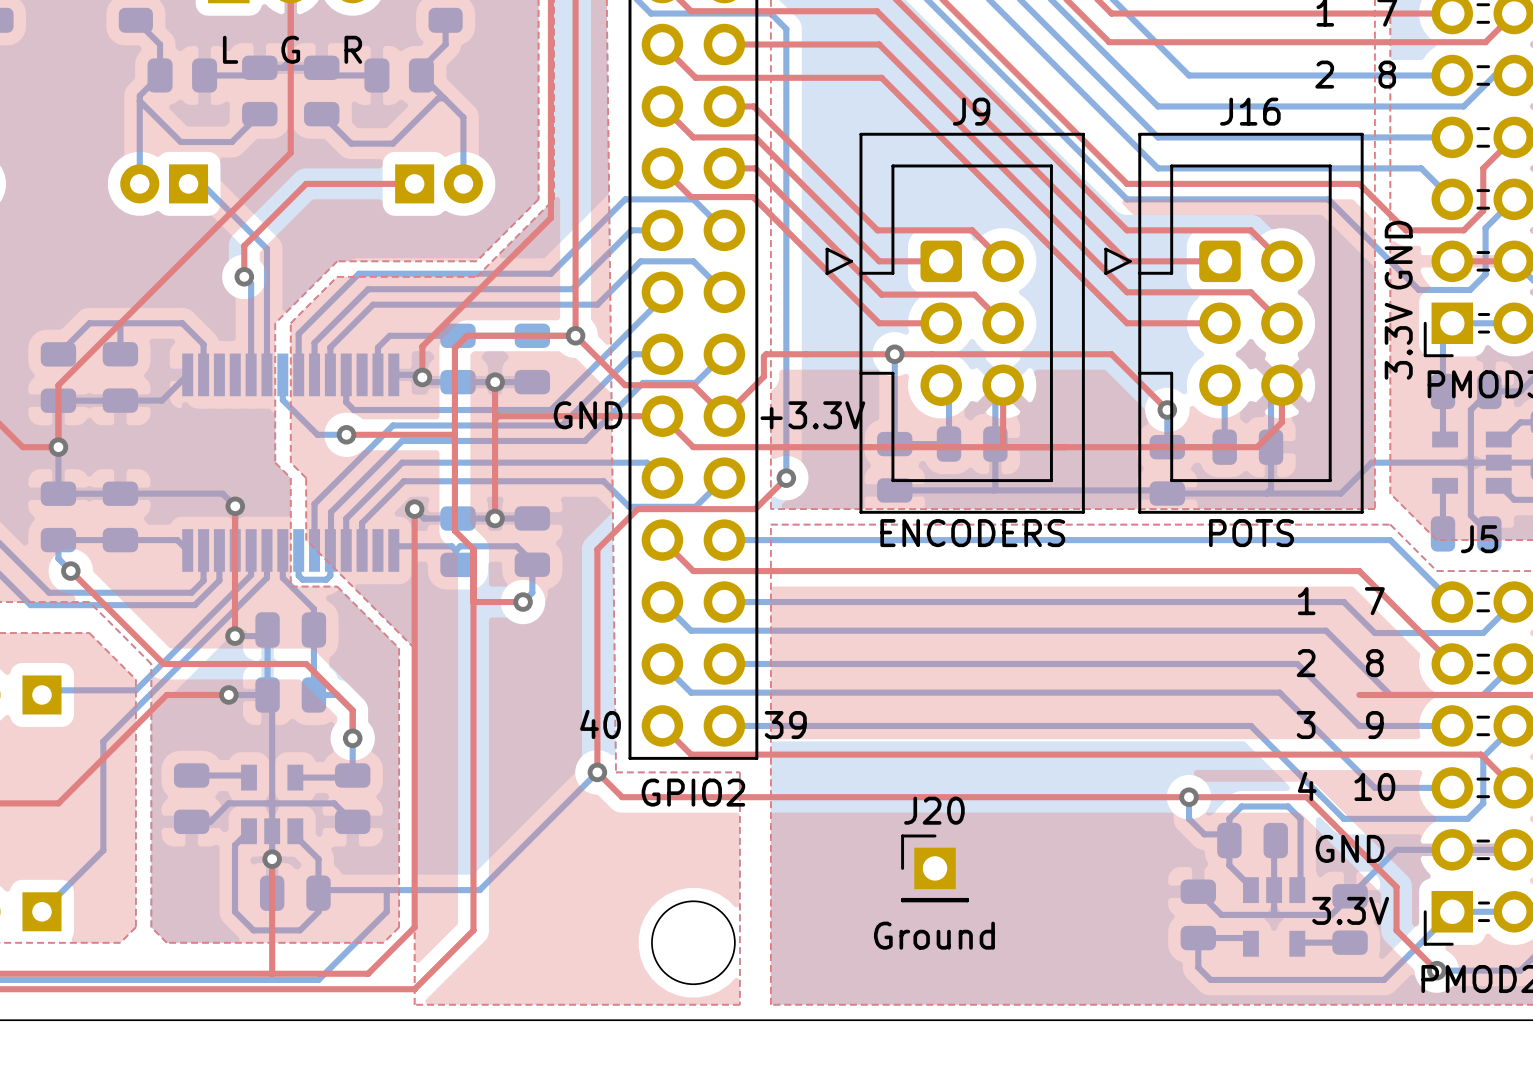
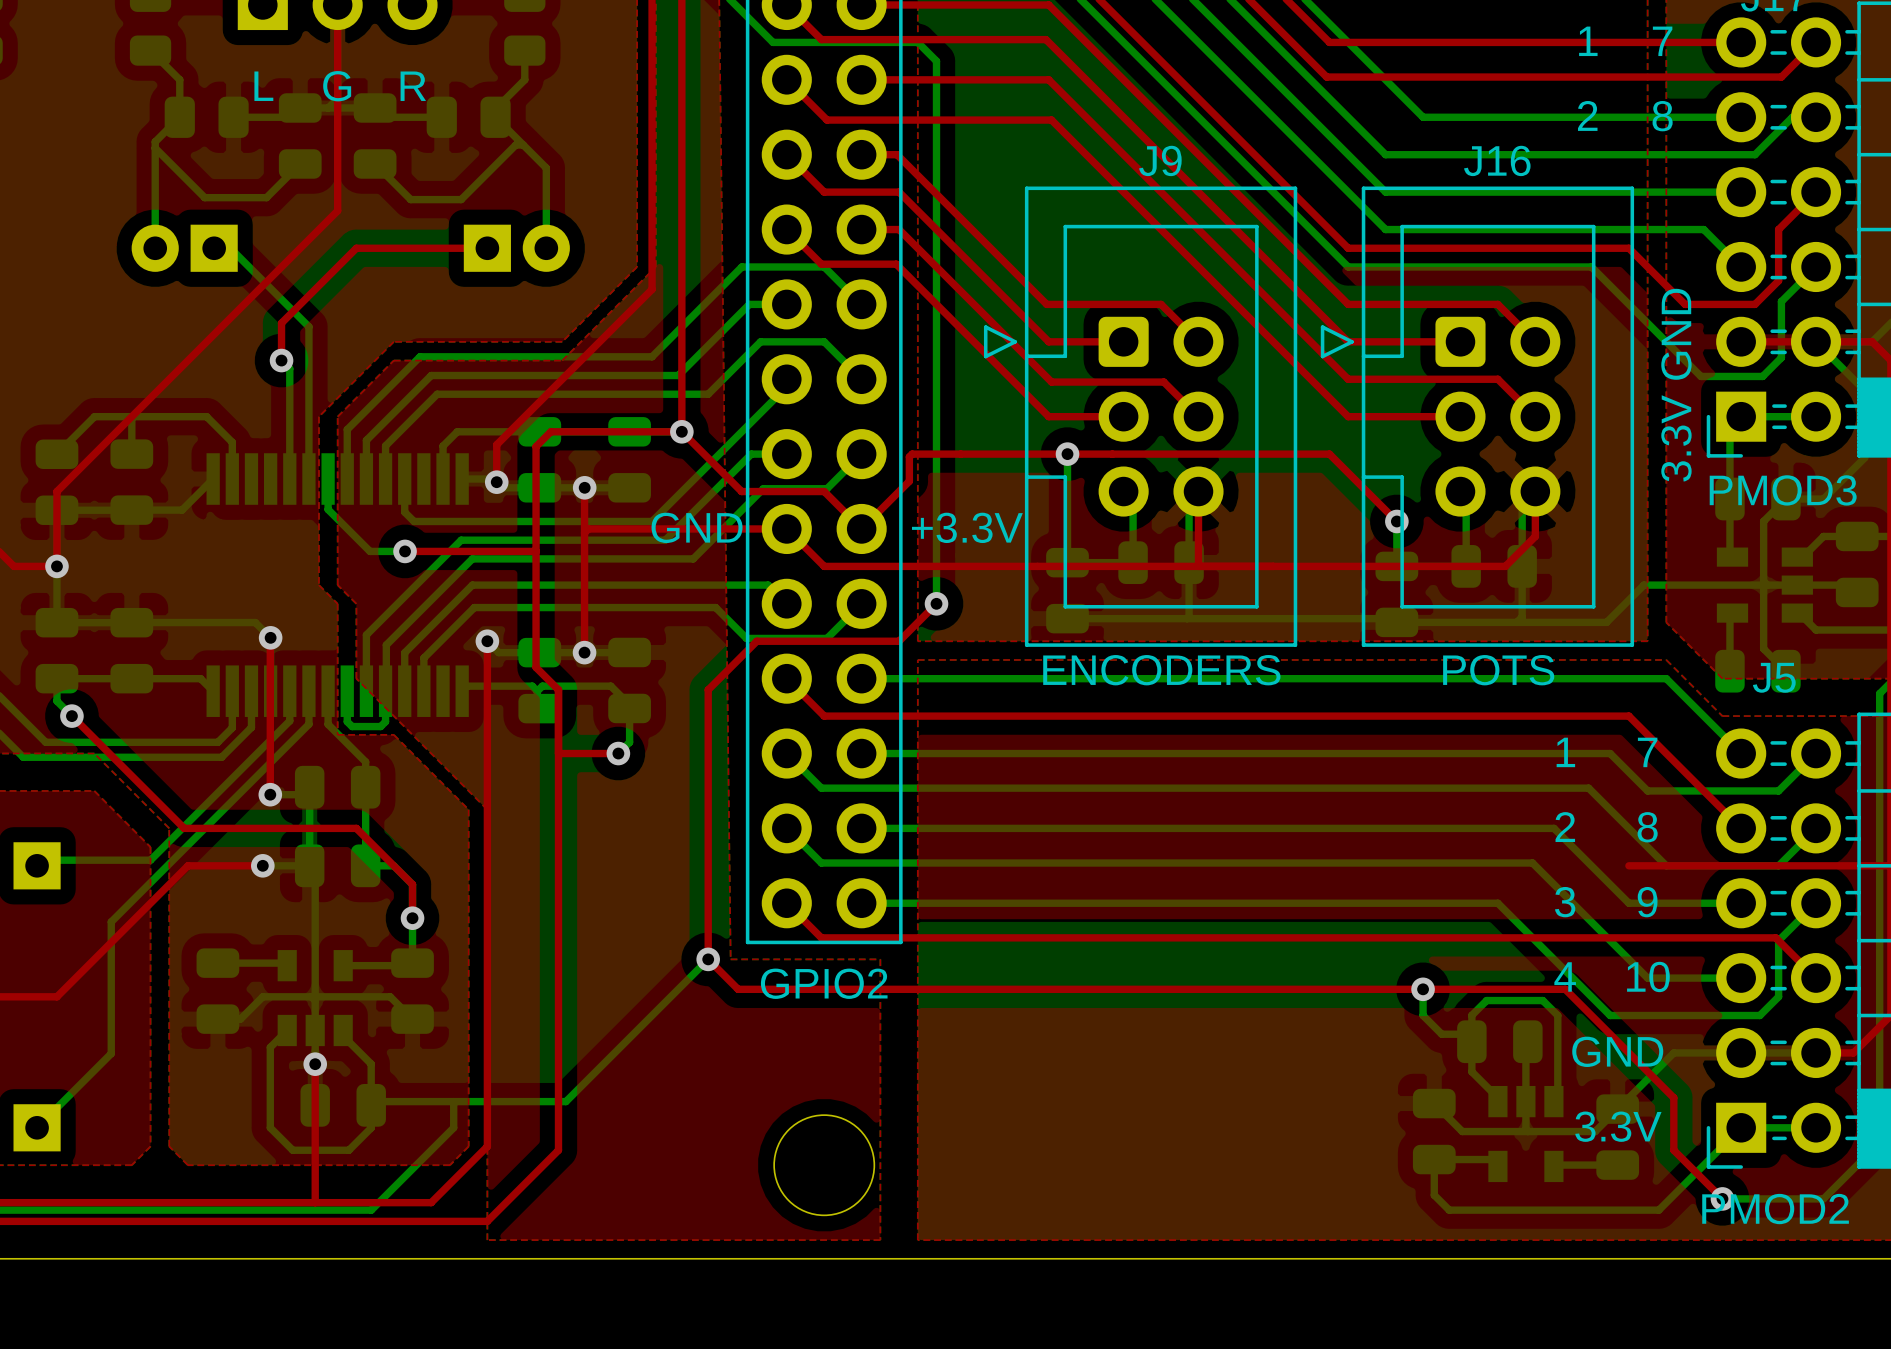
text: 40 (600, 724) -> none
text: 39 (785, 725) -> none
J20: (935, 868) -> none
text: Ground (934, 935) -> none

